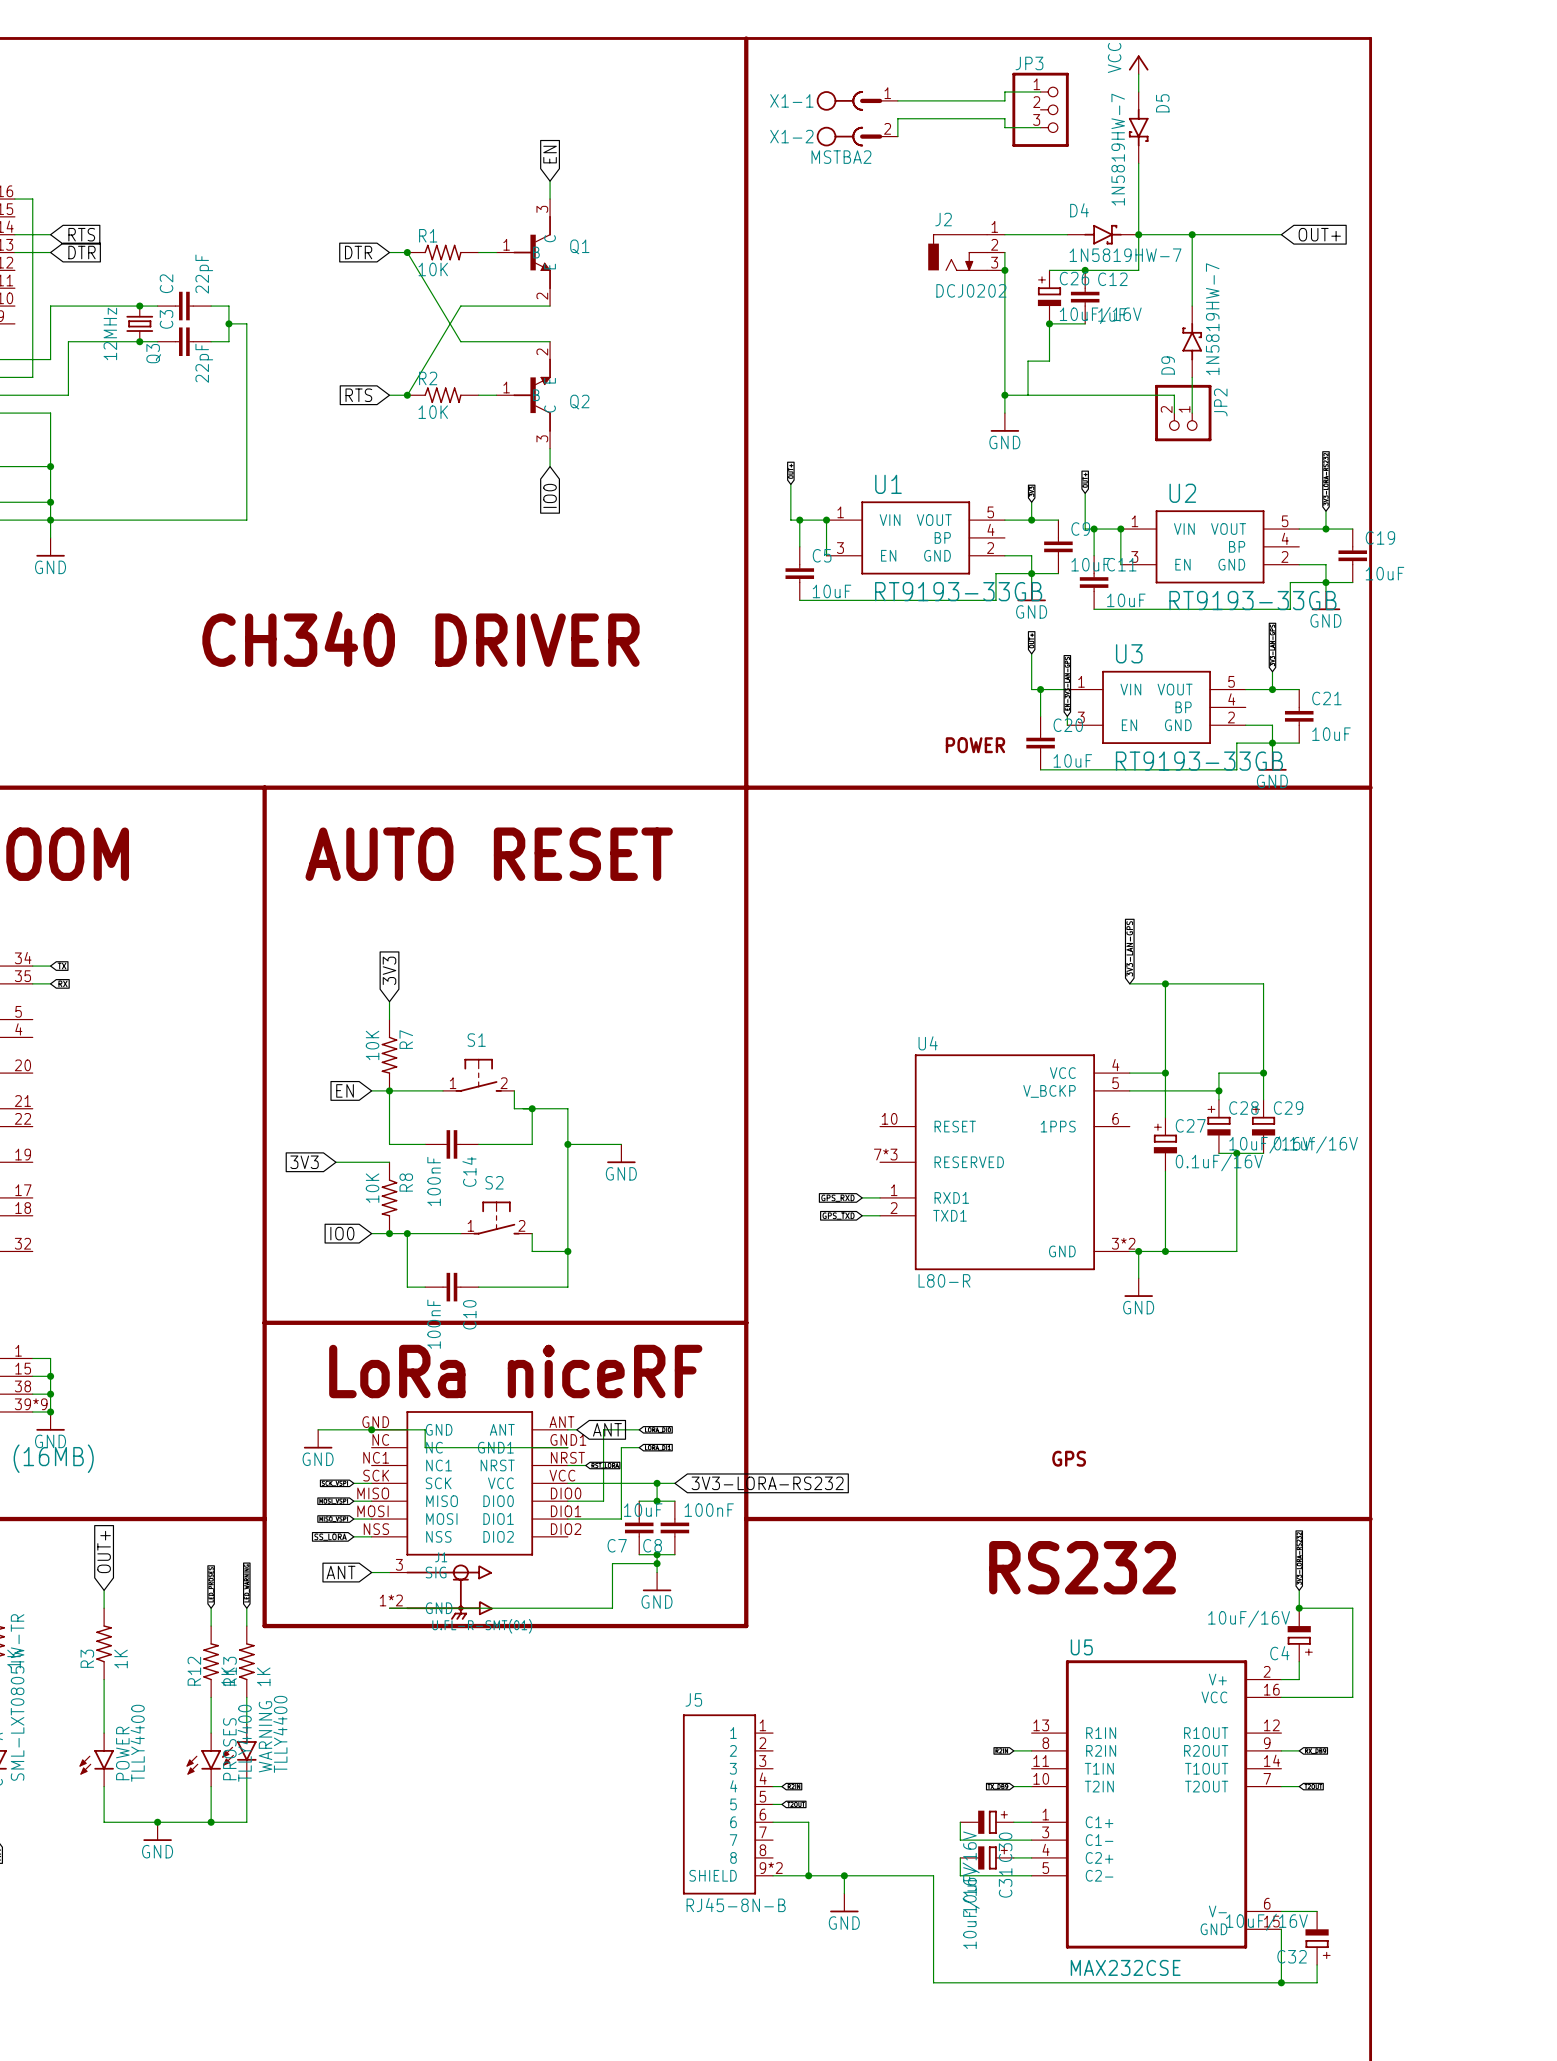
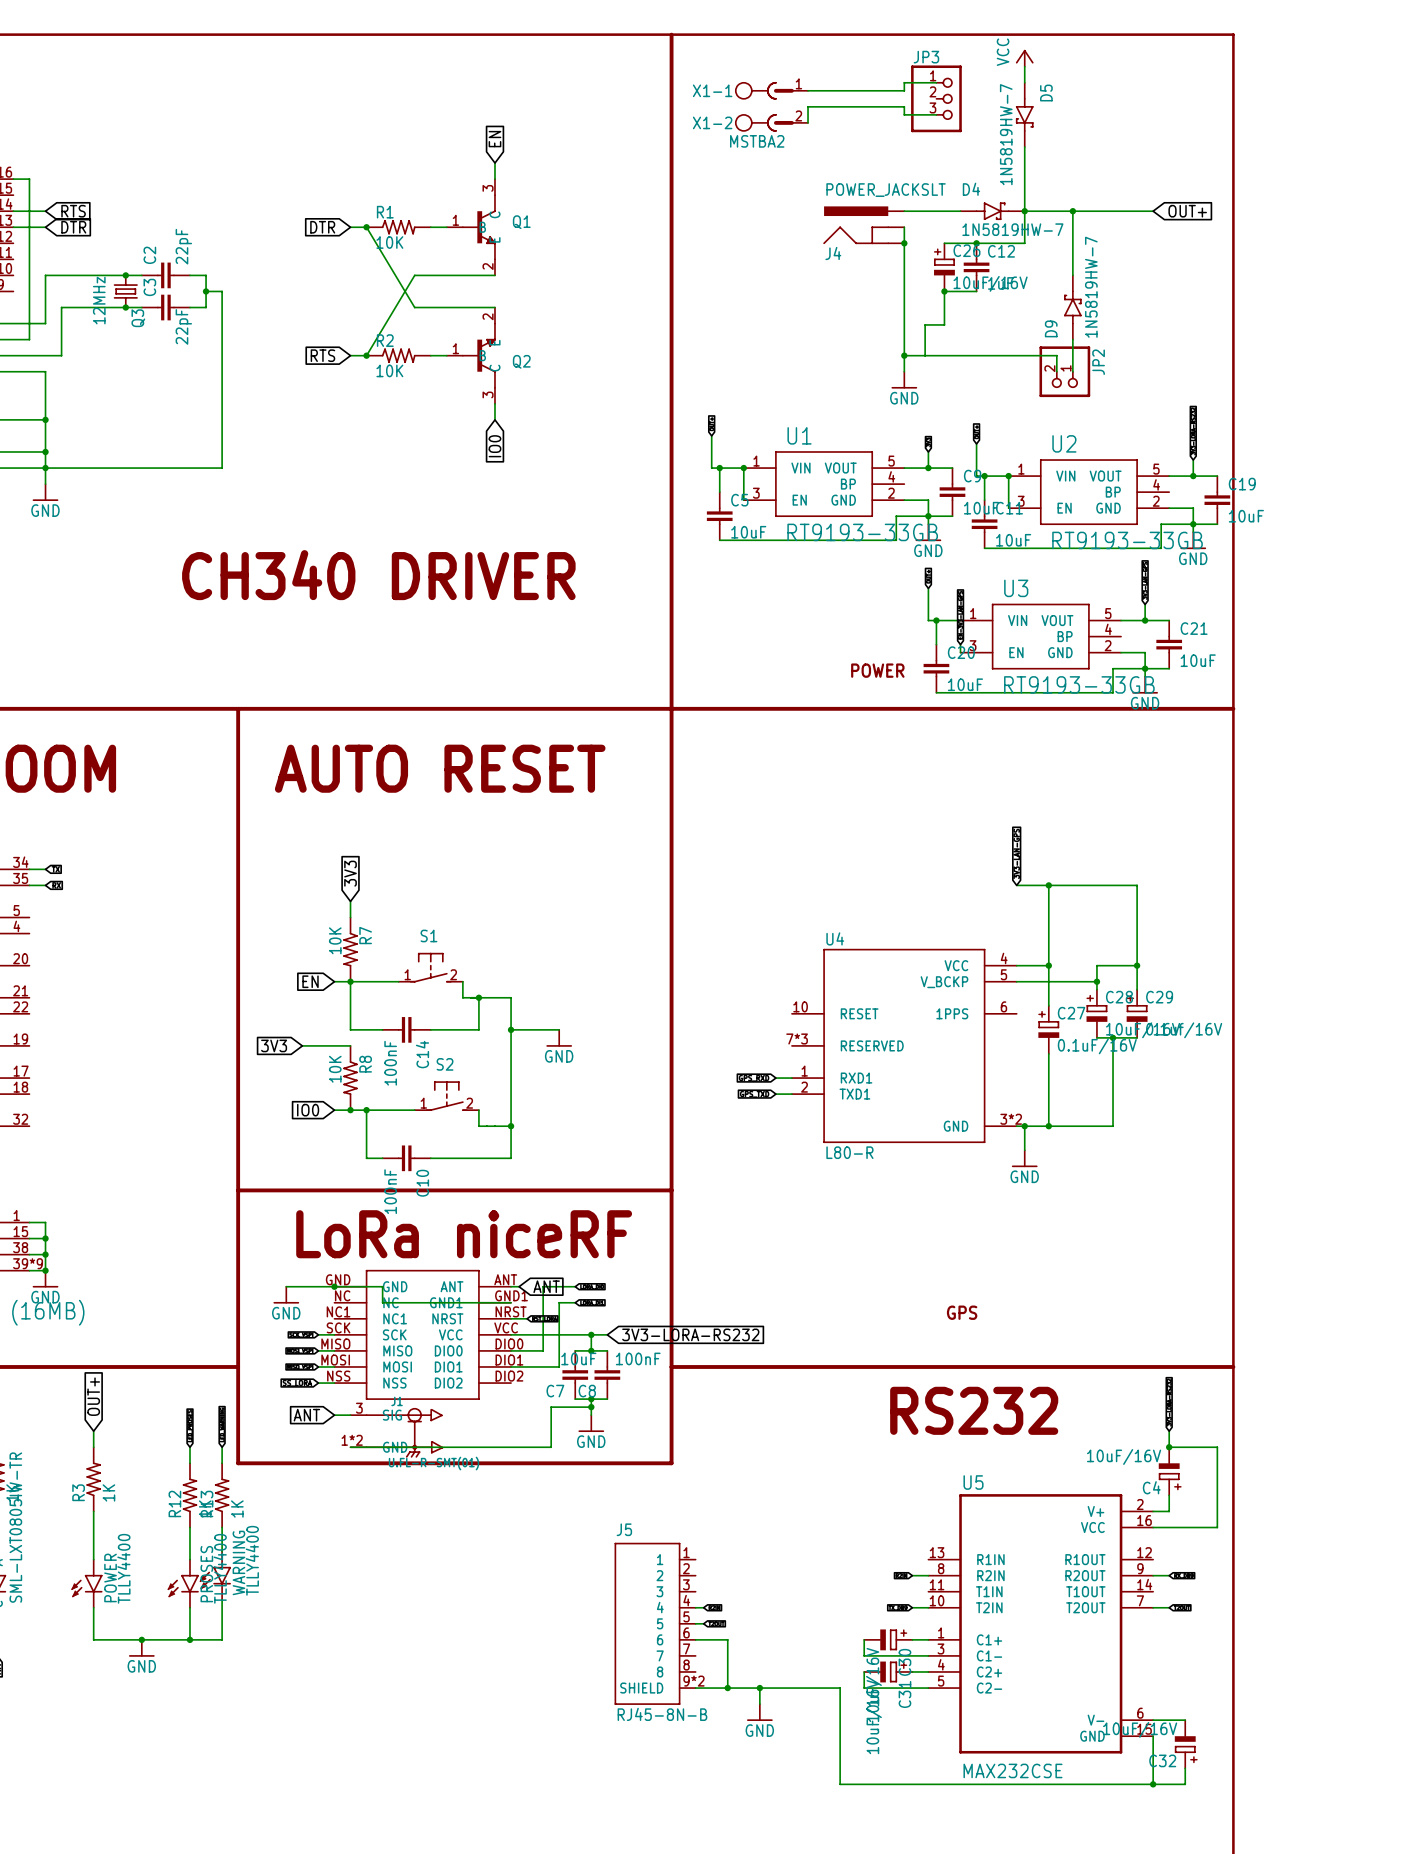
J4: none -> POWER_JACKSLT (863, 225)
J2: DCJ0202 (966, 252) -> none

